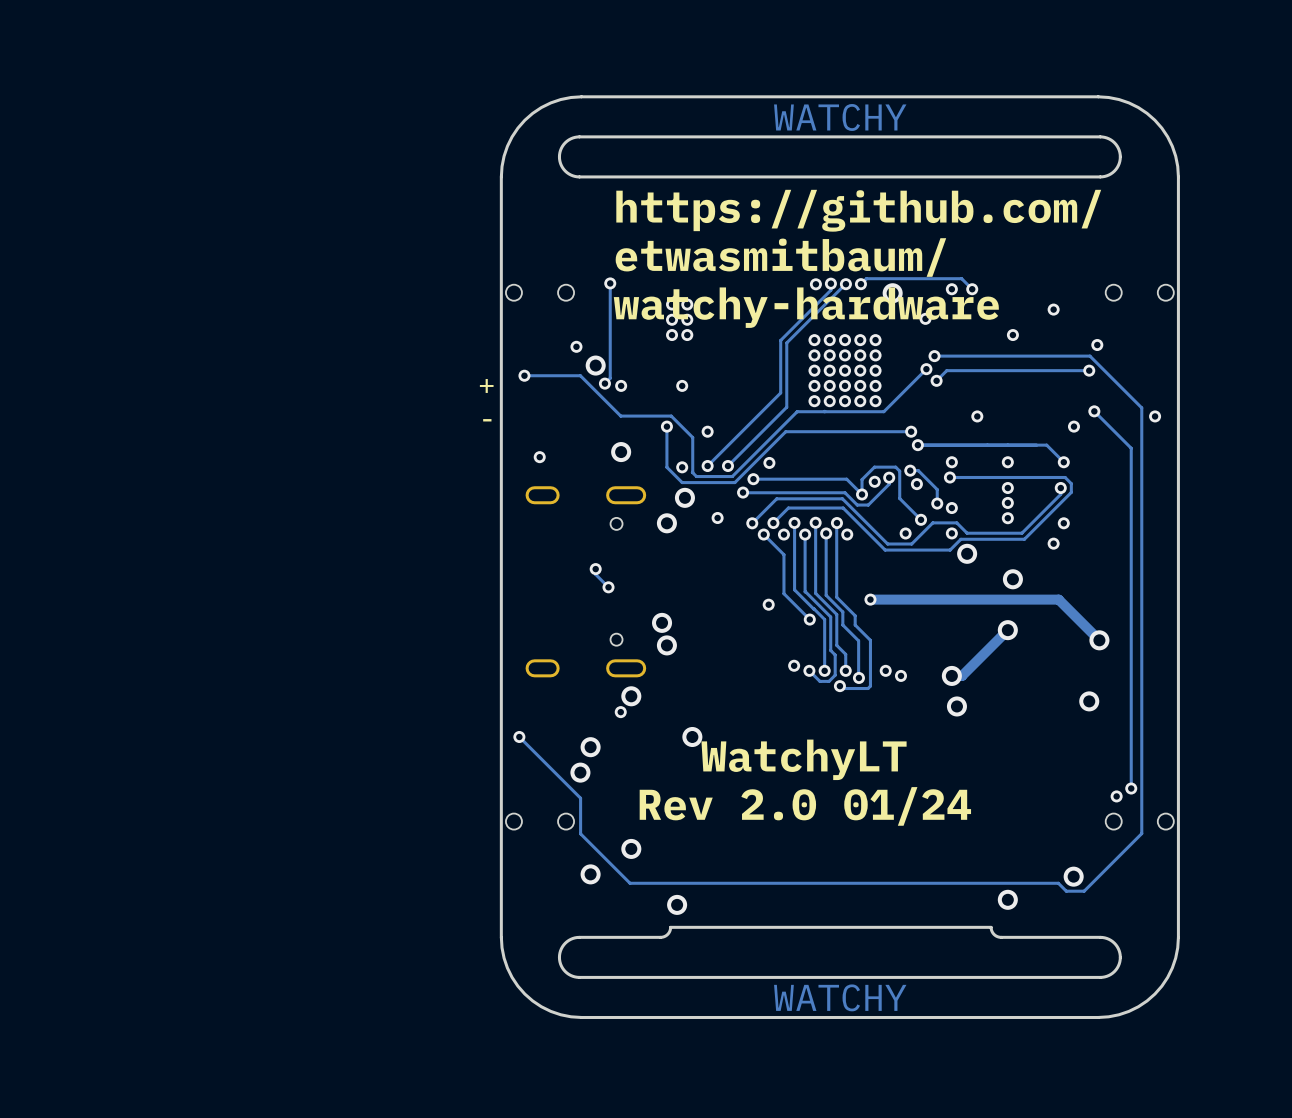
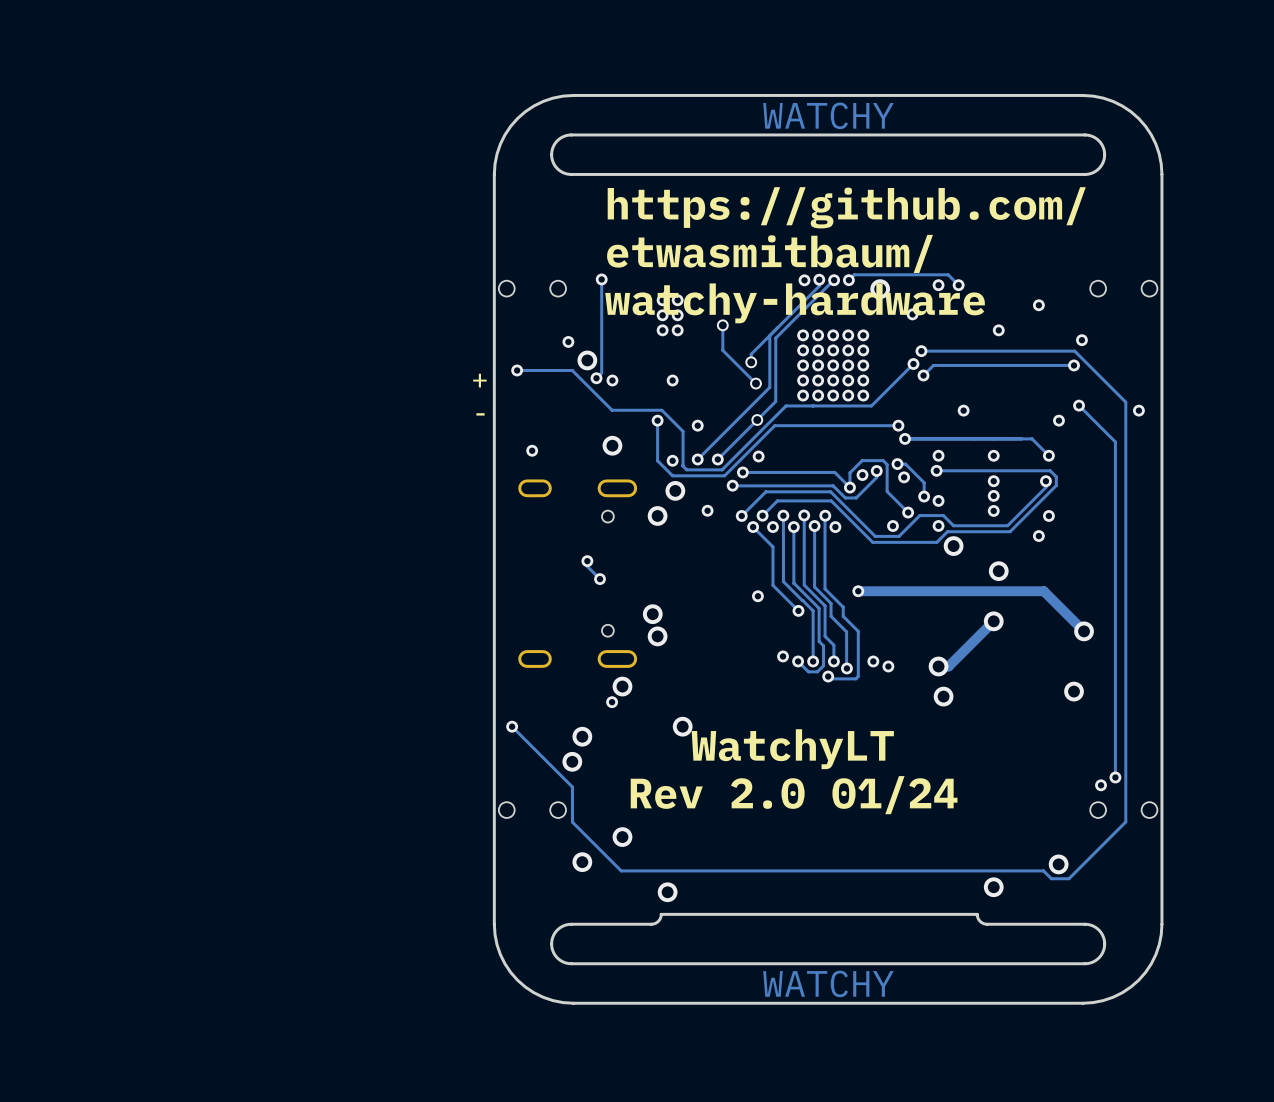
track: none -> (722, 325) (722, 350) (755, 383)
via: none -> (722, 325)
track: none -> (769, 335) (751, 354) (751, 362)
via: none -> (751, 362)
via: none -> (755, 383)
via: none -> (757, 420)

